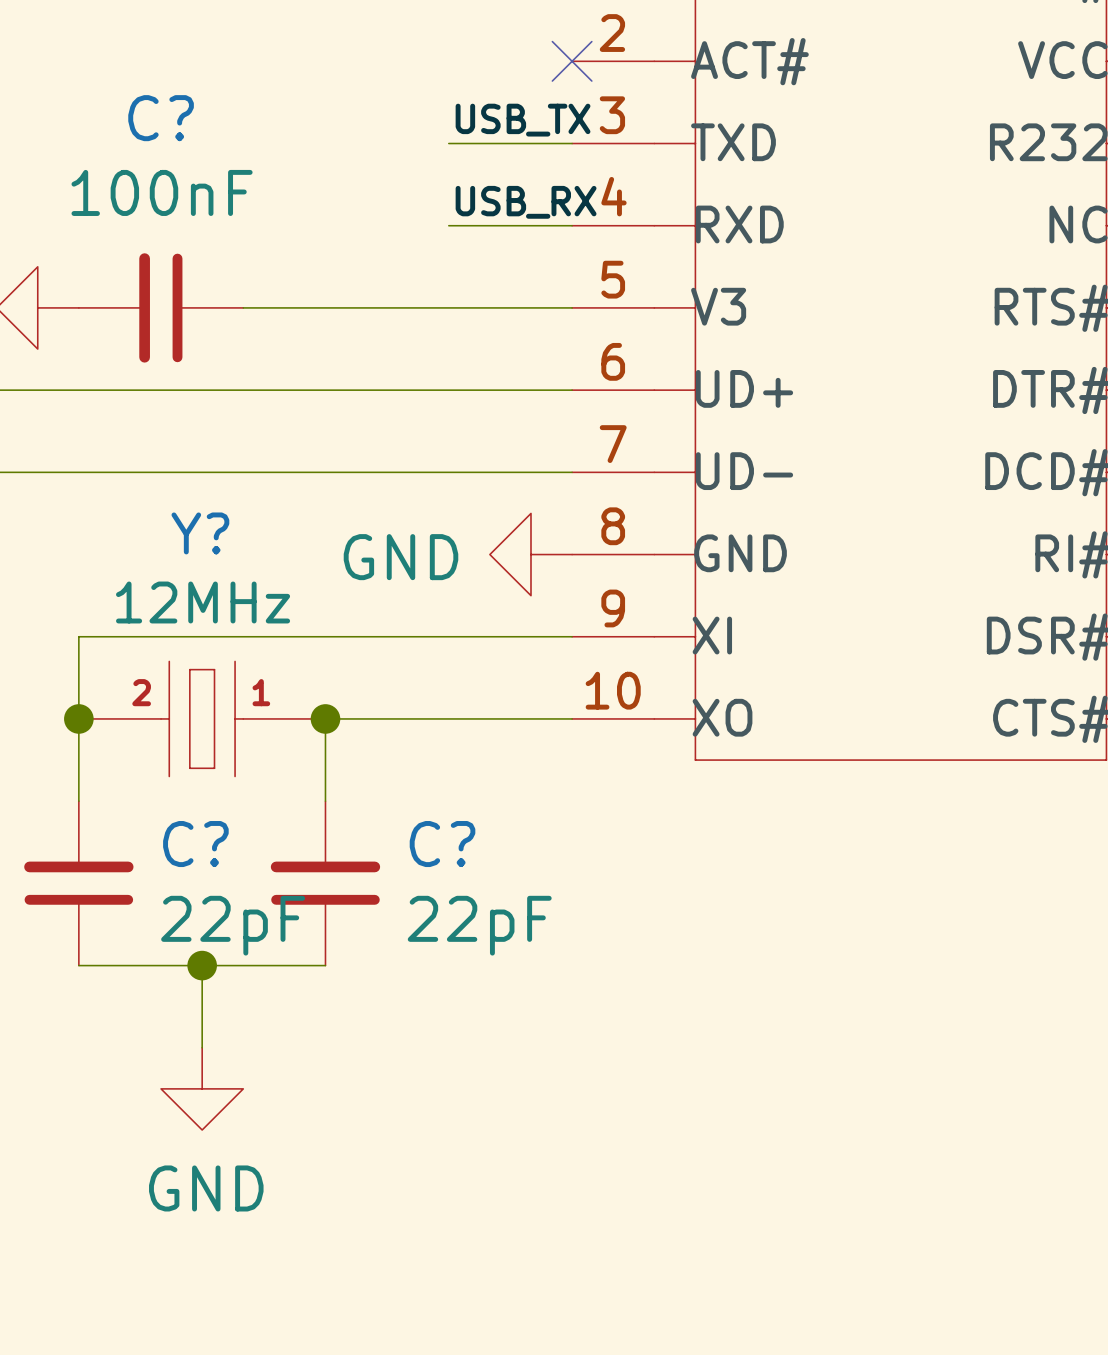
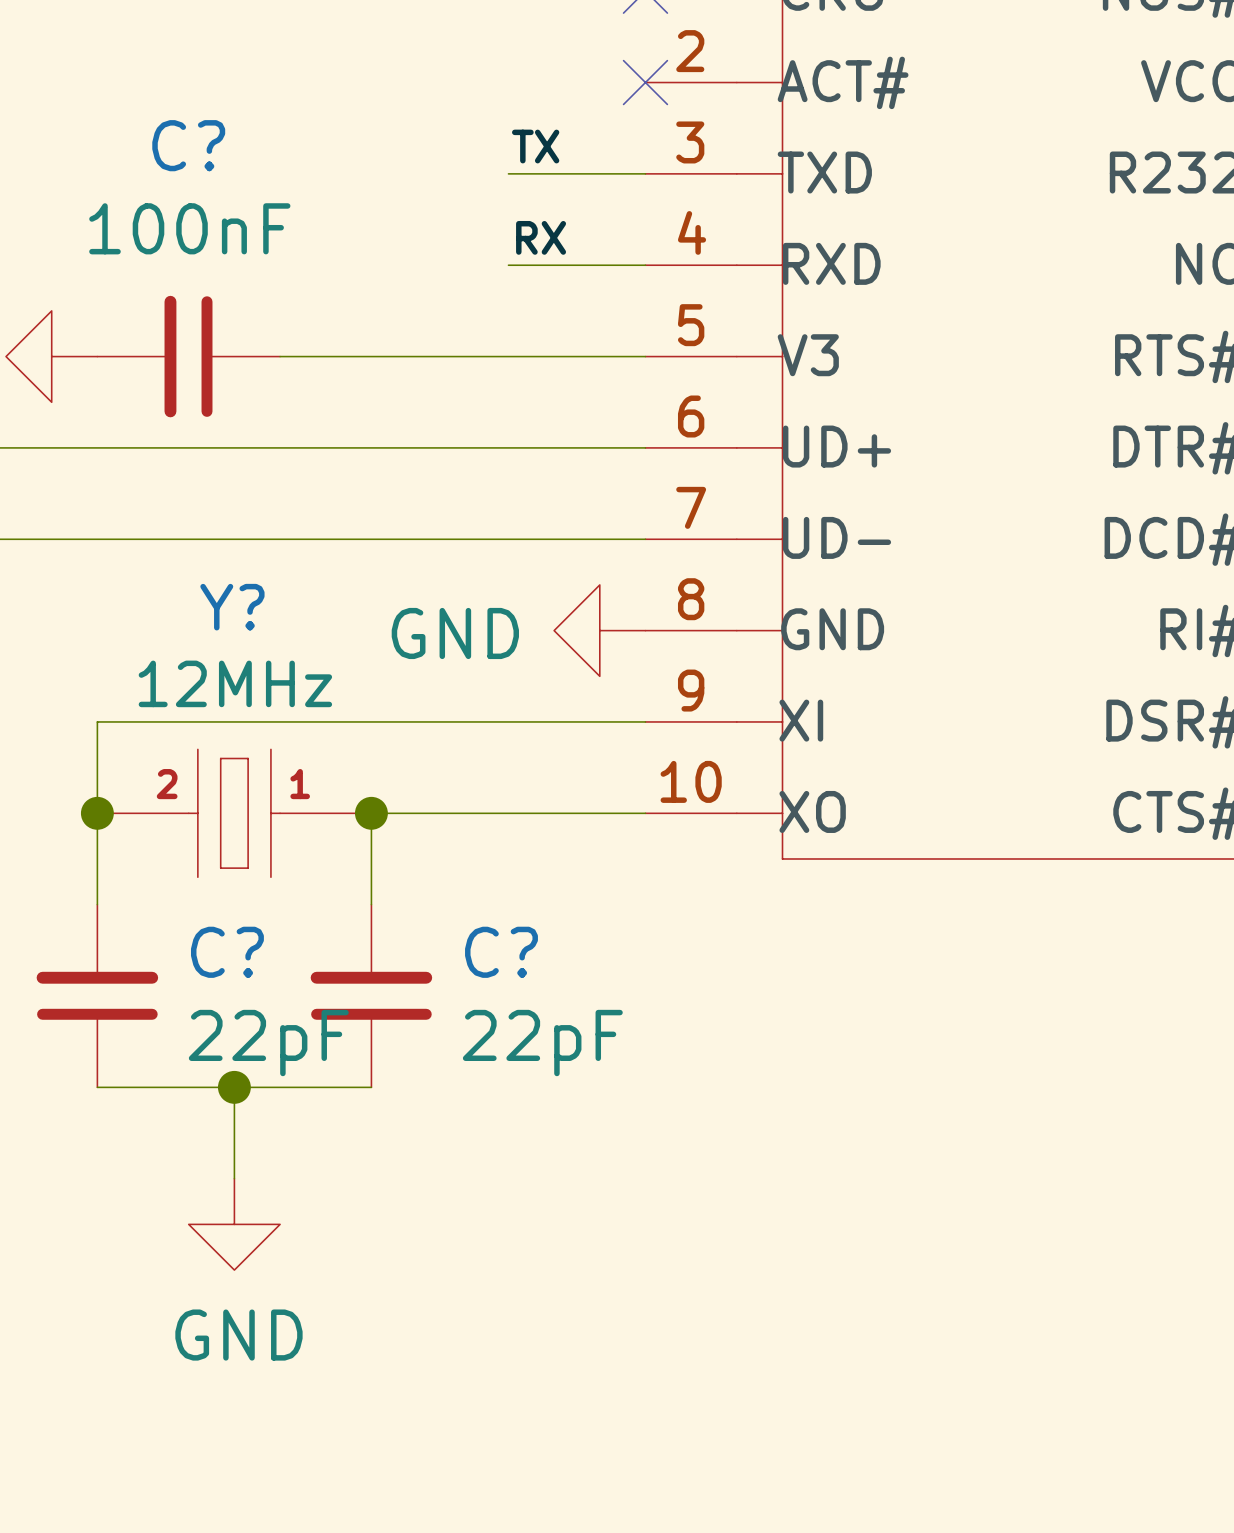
label: USB_TX (523, 120) -> TX (535, 146)
label: USB_RX (526, 202) -> RX (541, 237)

